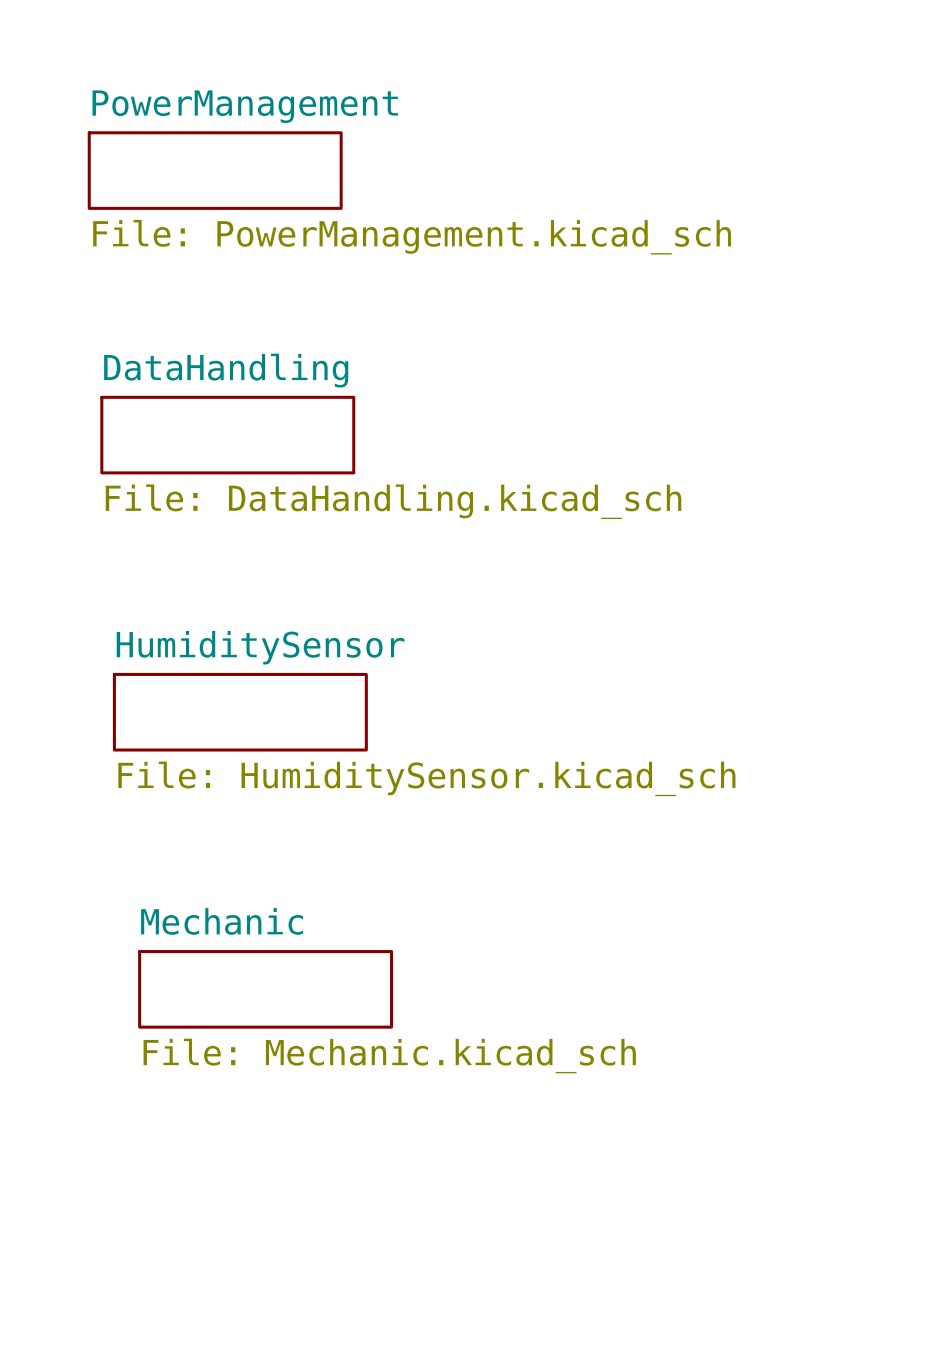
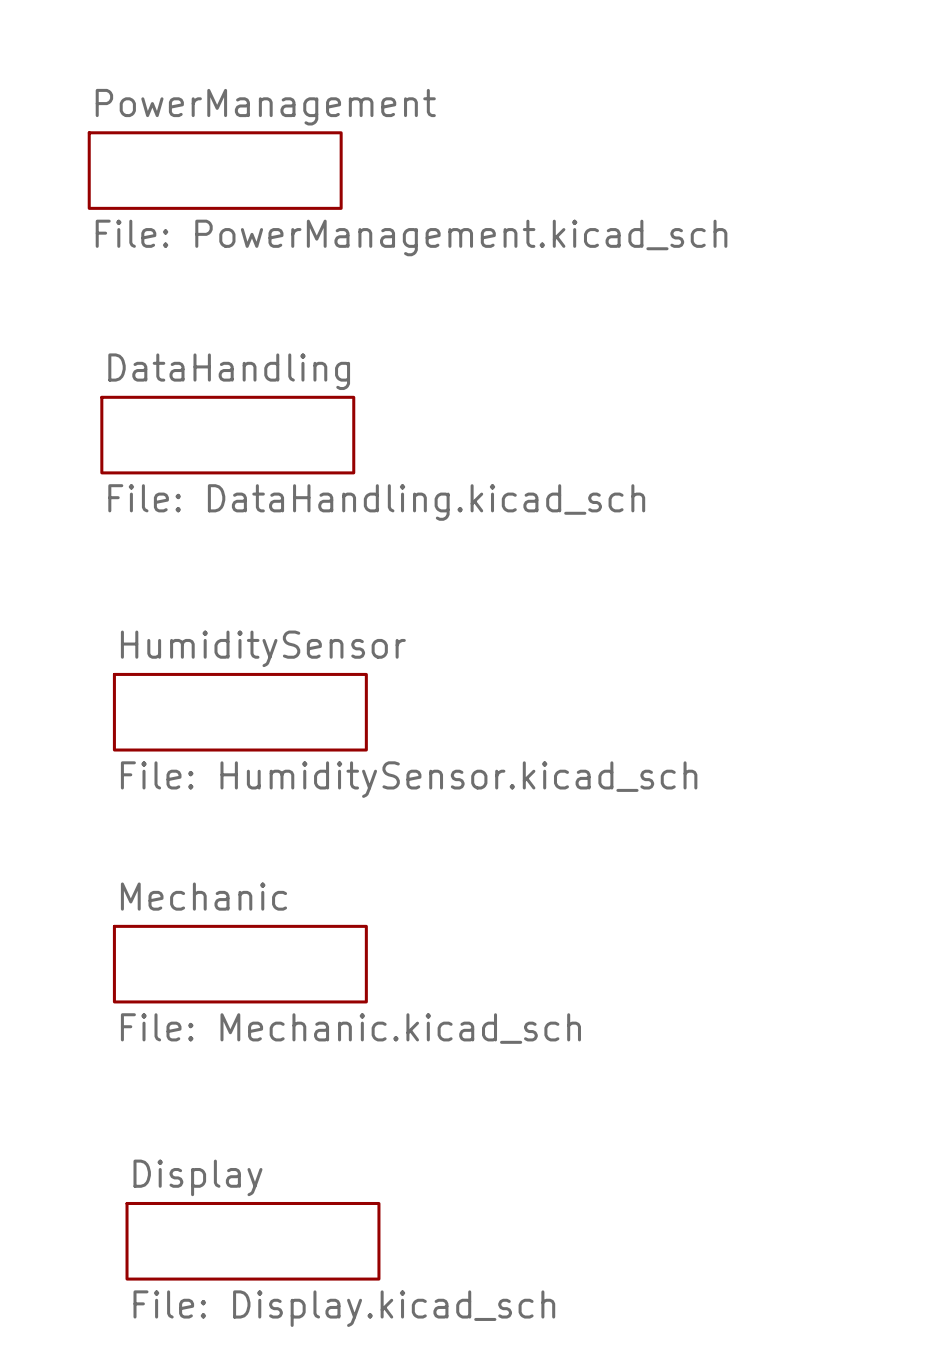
sheet Mechanic position: (265, 989) -> (240, 964)
sheet Display: none -> File: Display.kicad_sch (252, 1241)

